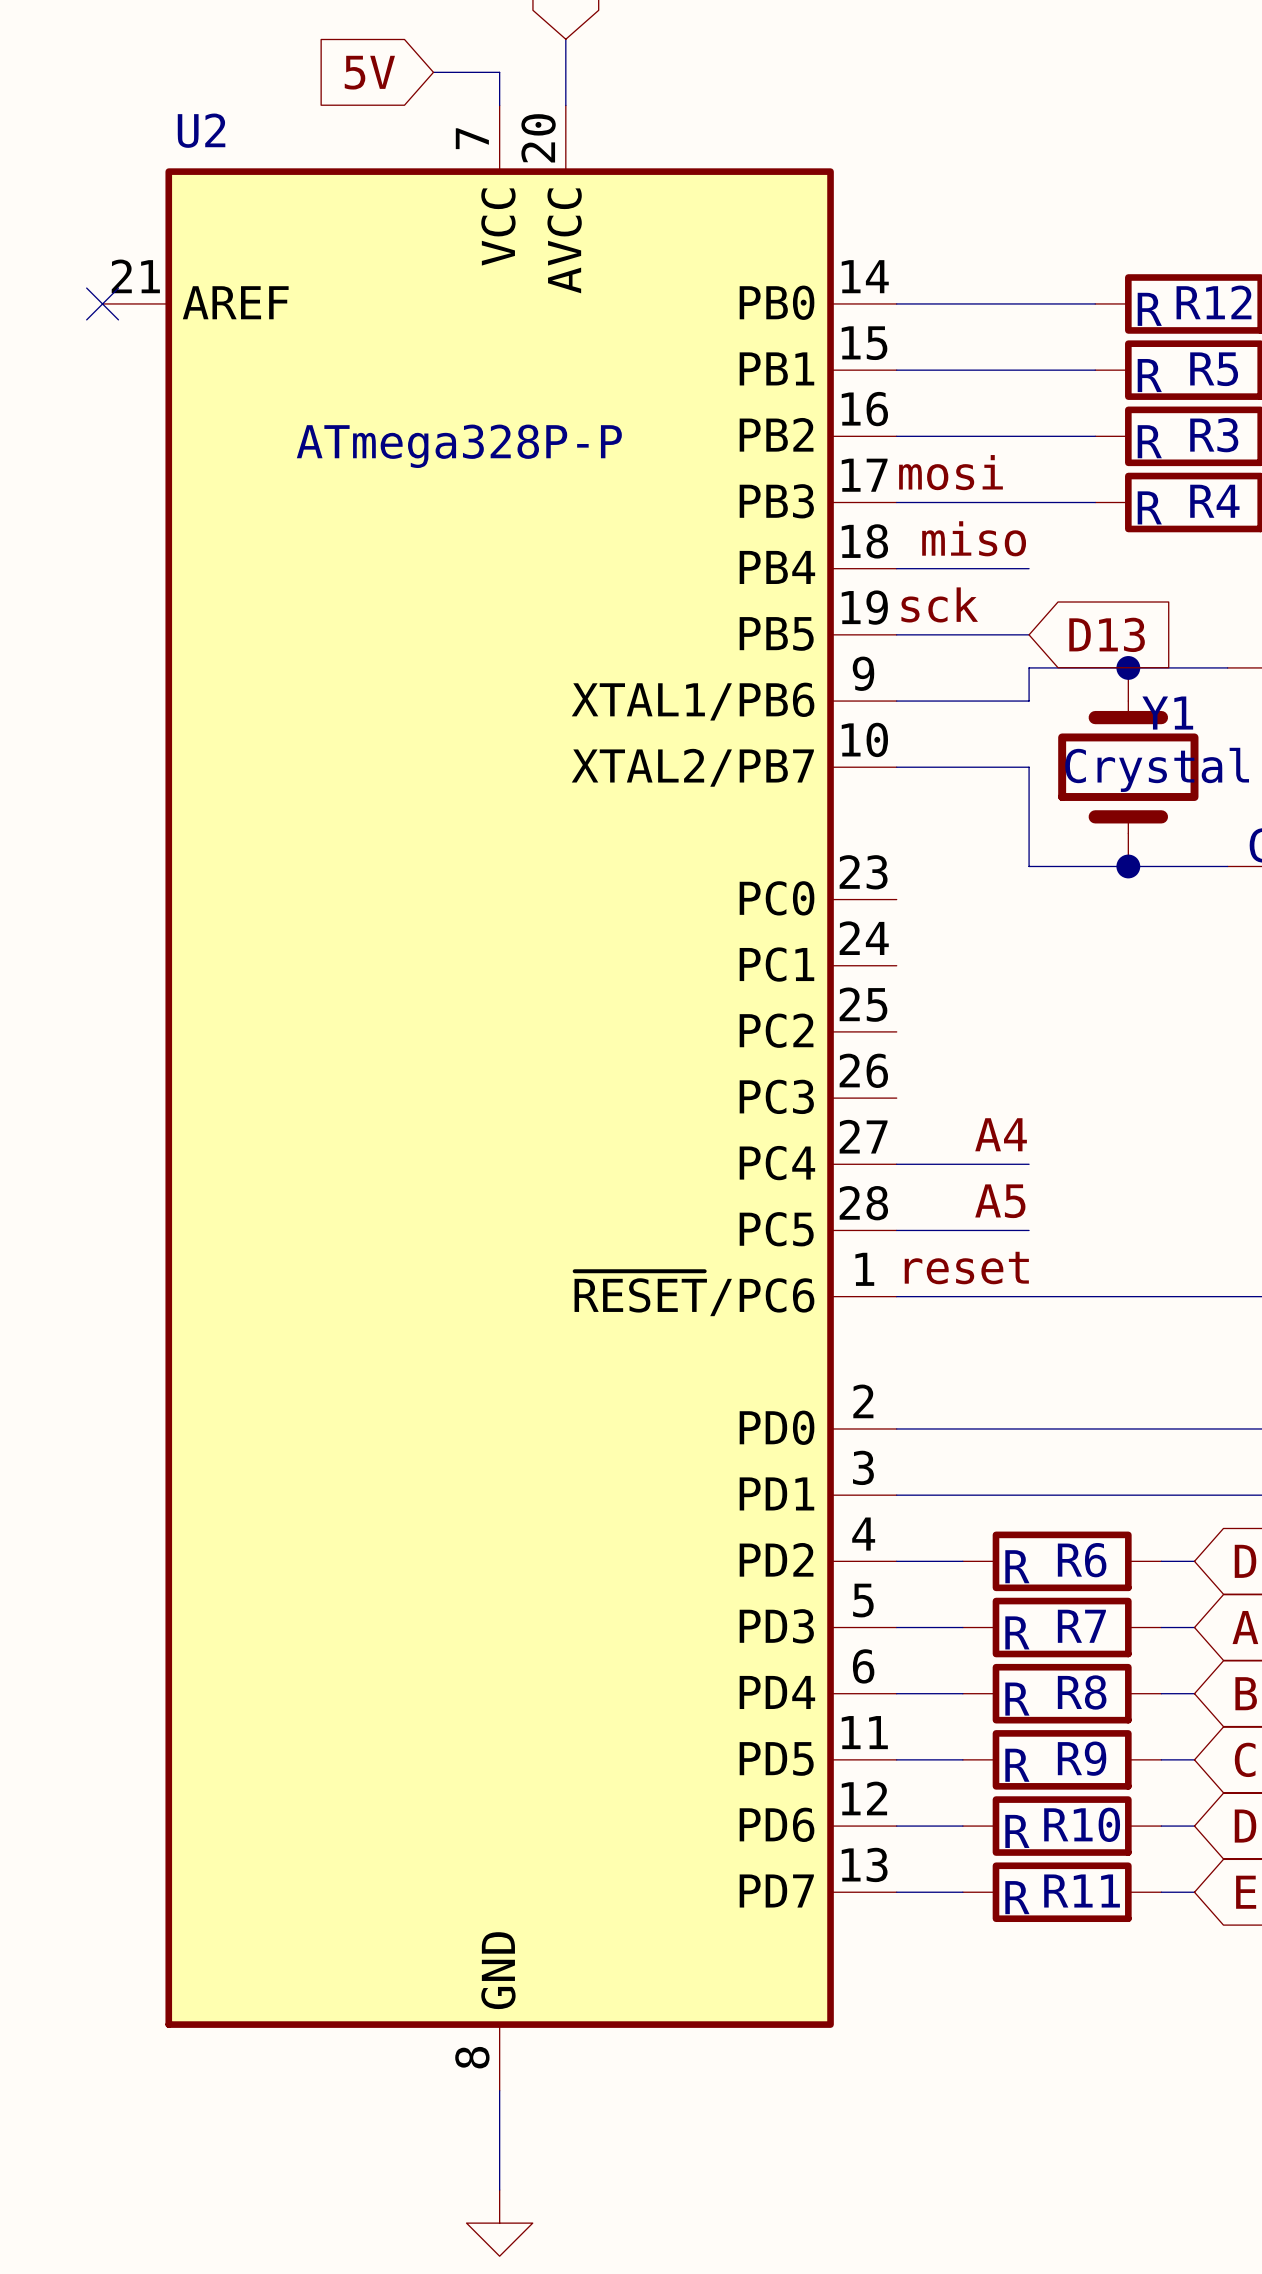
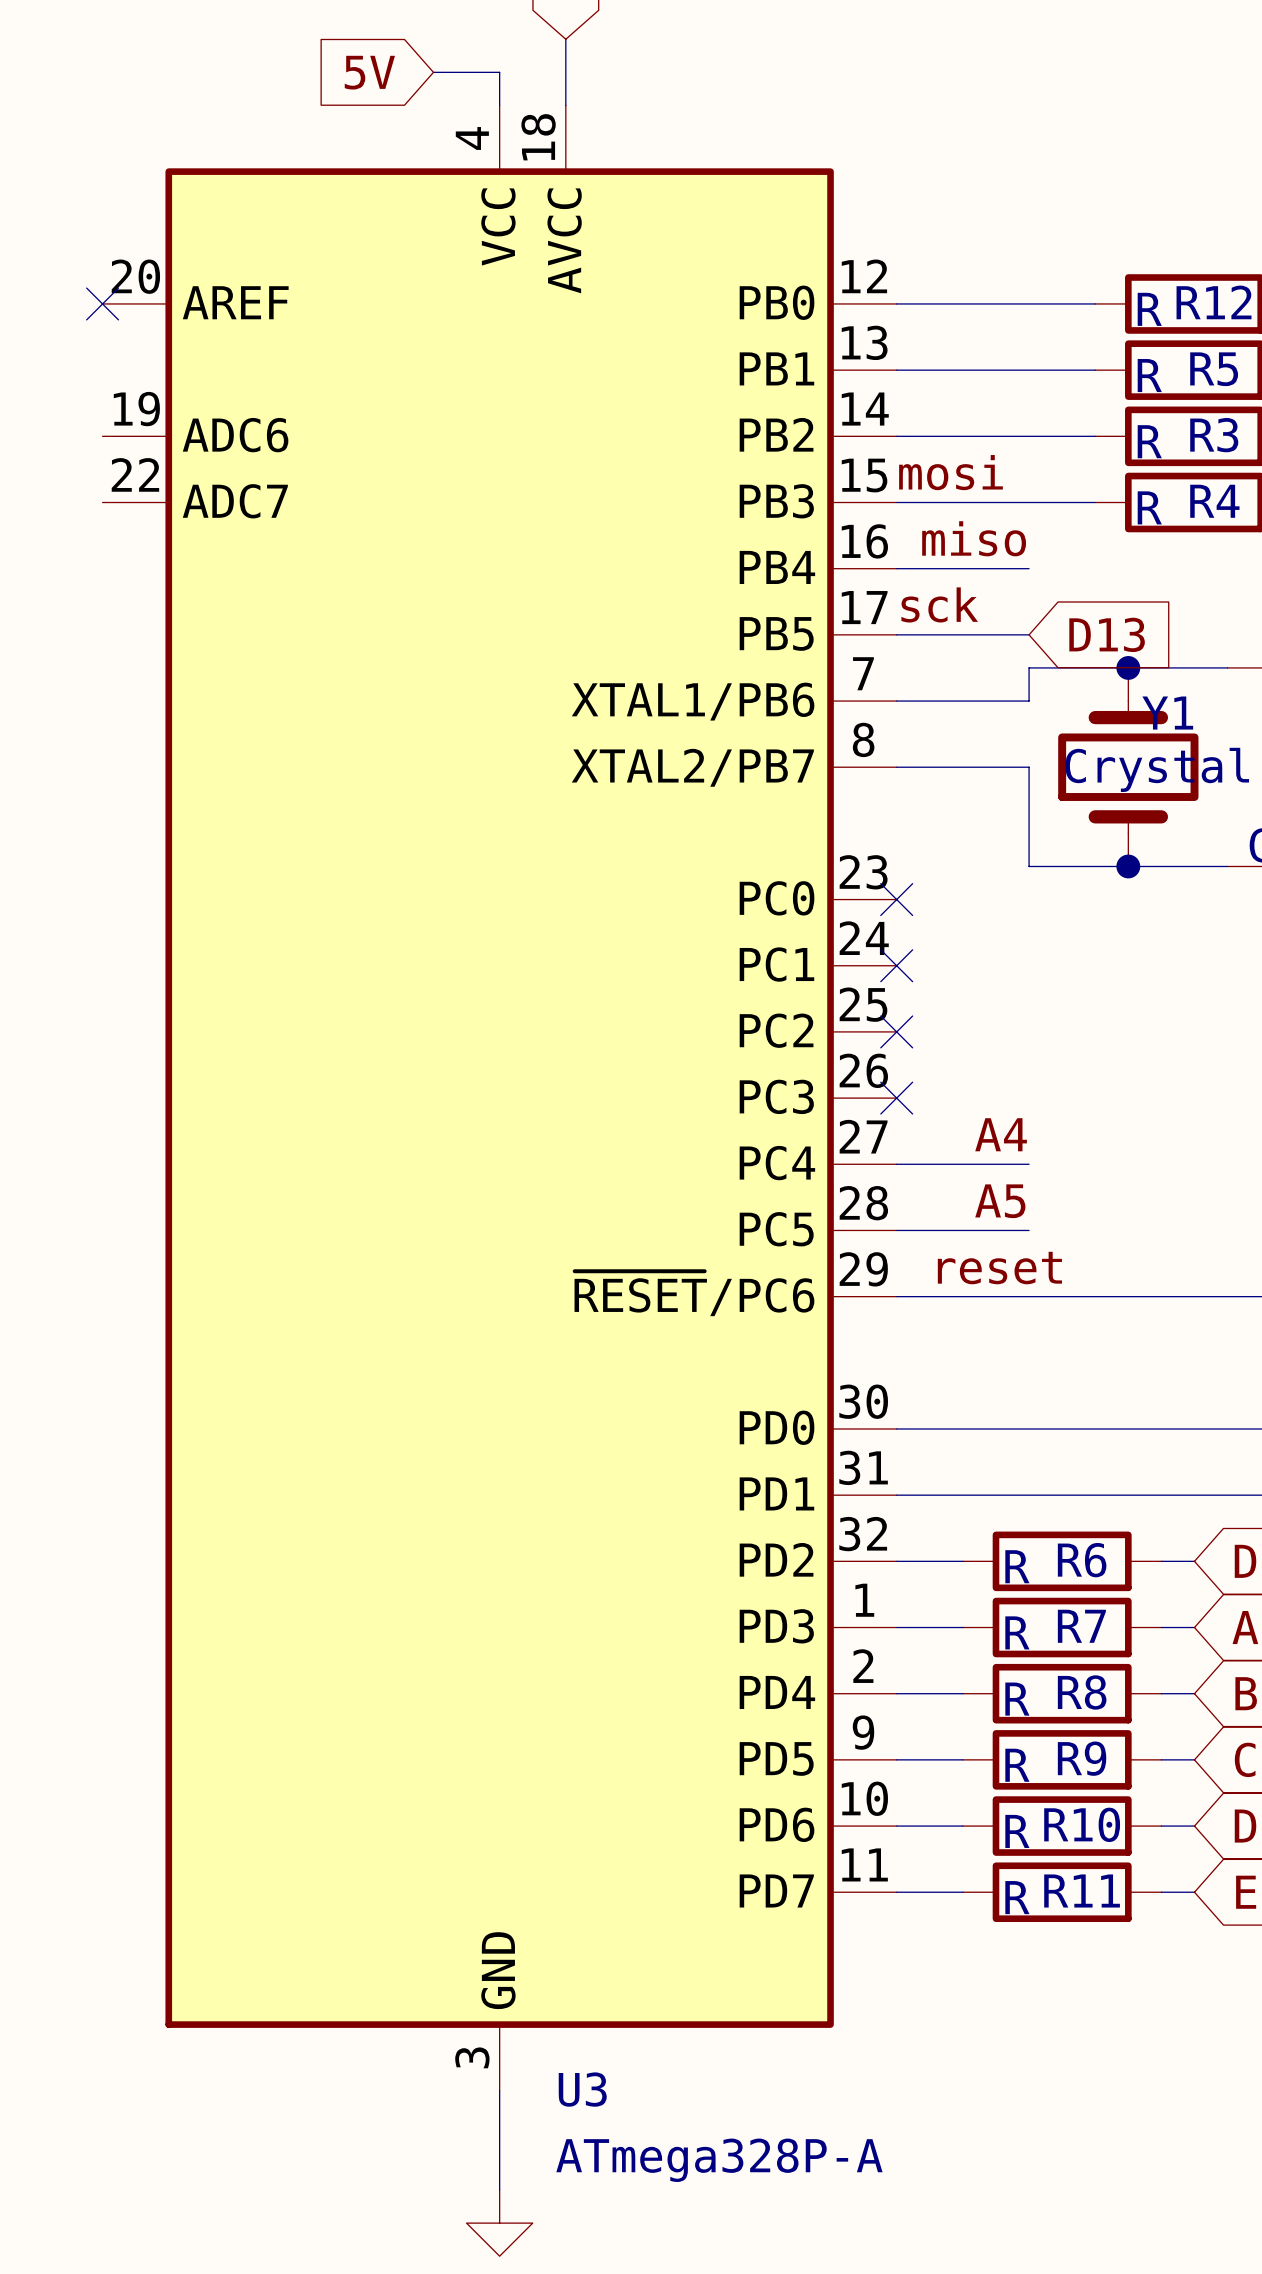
no-connect mark: none -> (896, 899)
no-connect mark: none -> (896, 965)
no-connect mark: none -> (896, 1031)
U2: ATmega328P-P (499, 1098) -> none
U3: none -> ATmega328P-A (499, 1098)
no-connect mark: none -> (896, 1098)
label position: reset (966, 1268) -> reset (999, 1268)

